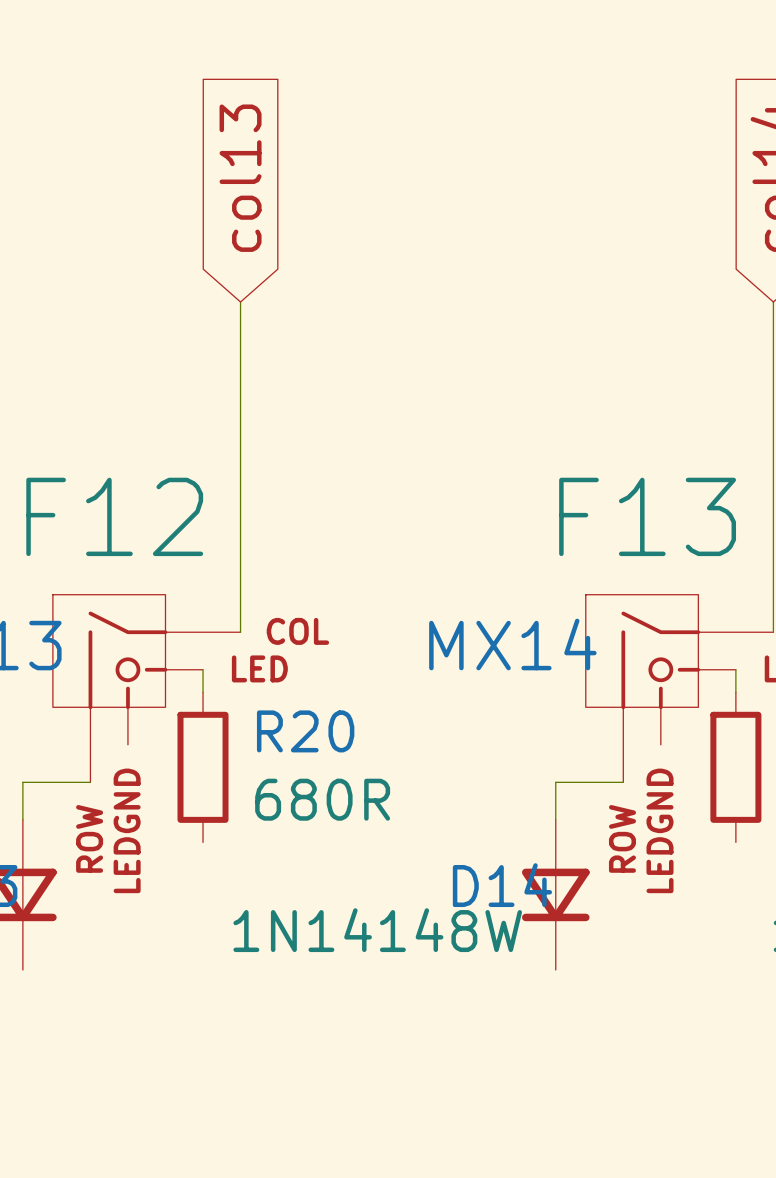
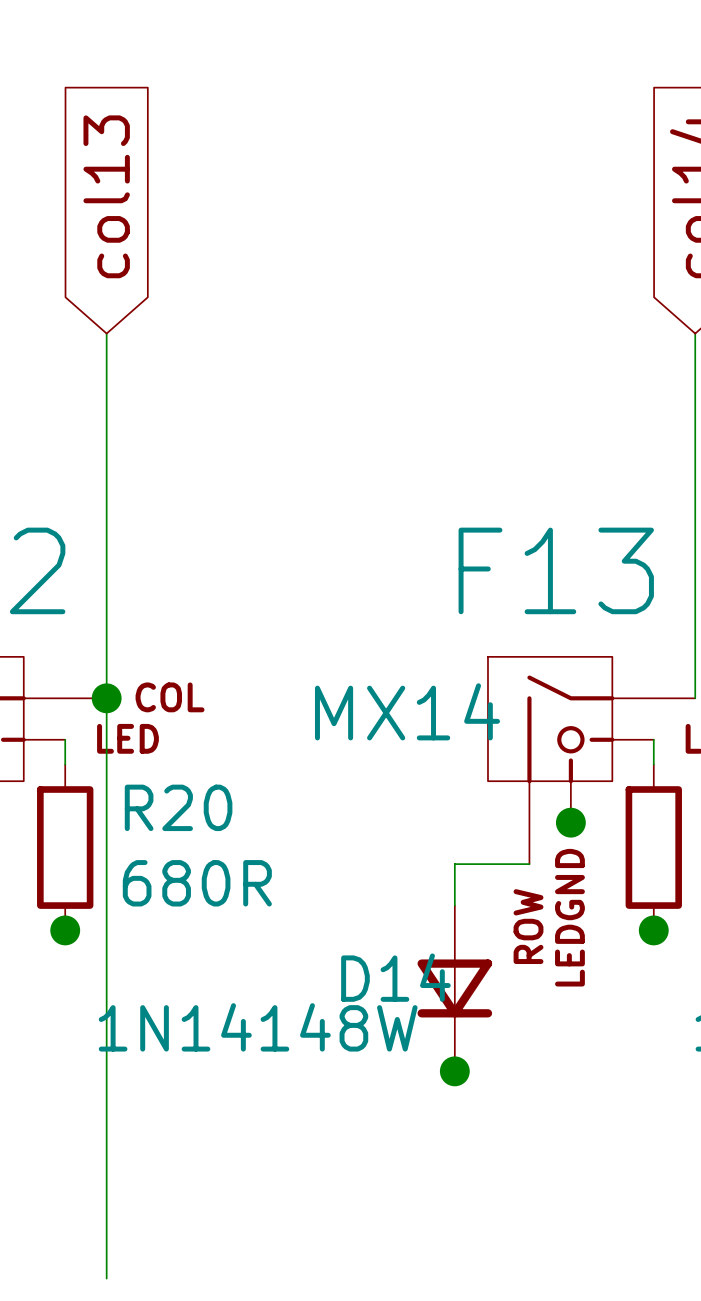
wire: none -> (106, 698) (106, 1278)
junction: none -> (106, 698)
junction: none -> (570, 822)
junction: none -> (65, 930)
junction: none -> (653, 930)
junction: none -> (454, 1071)

